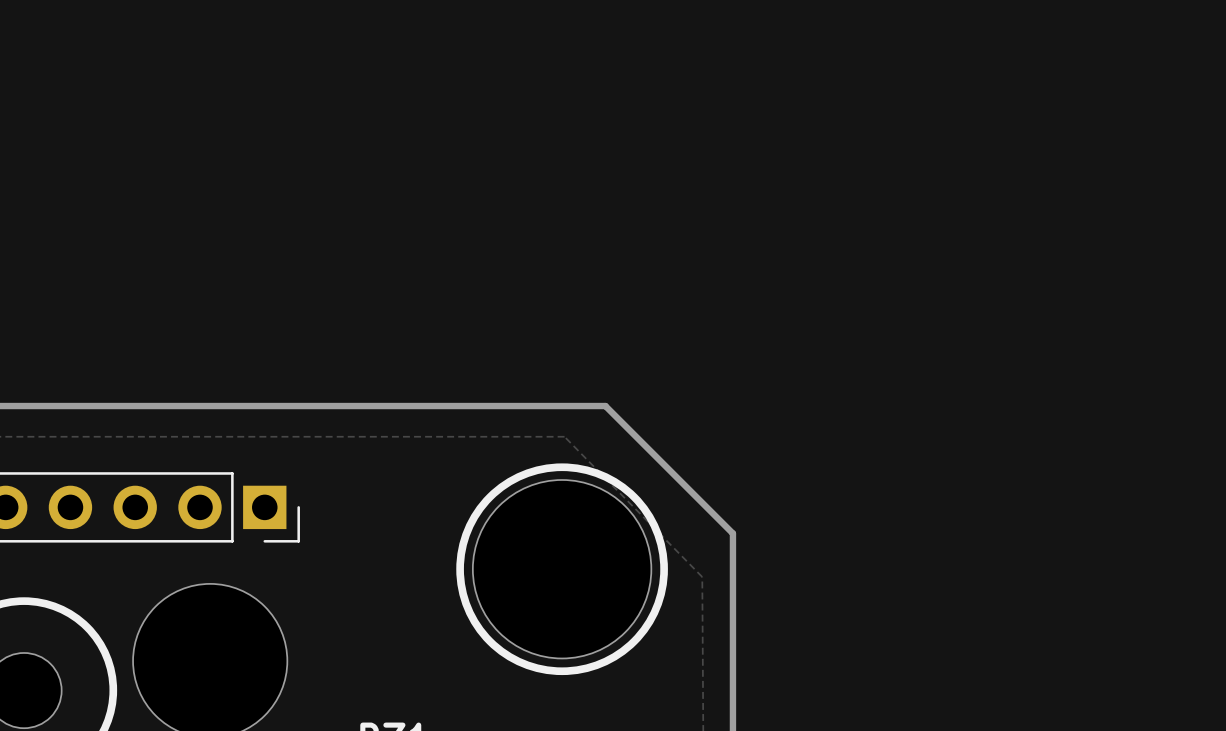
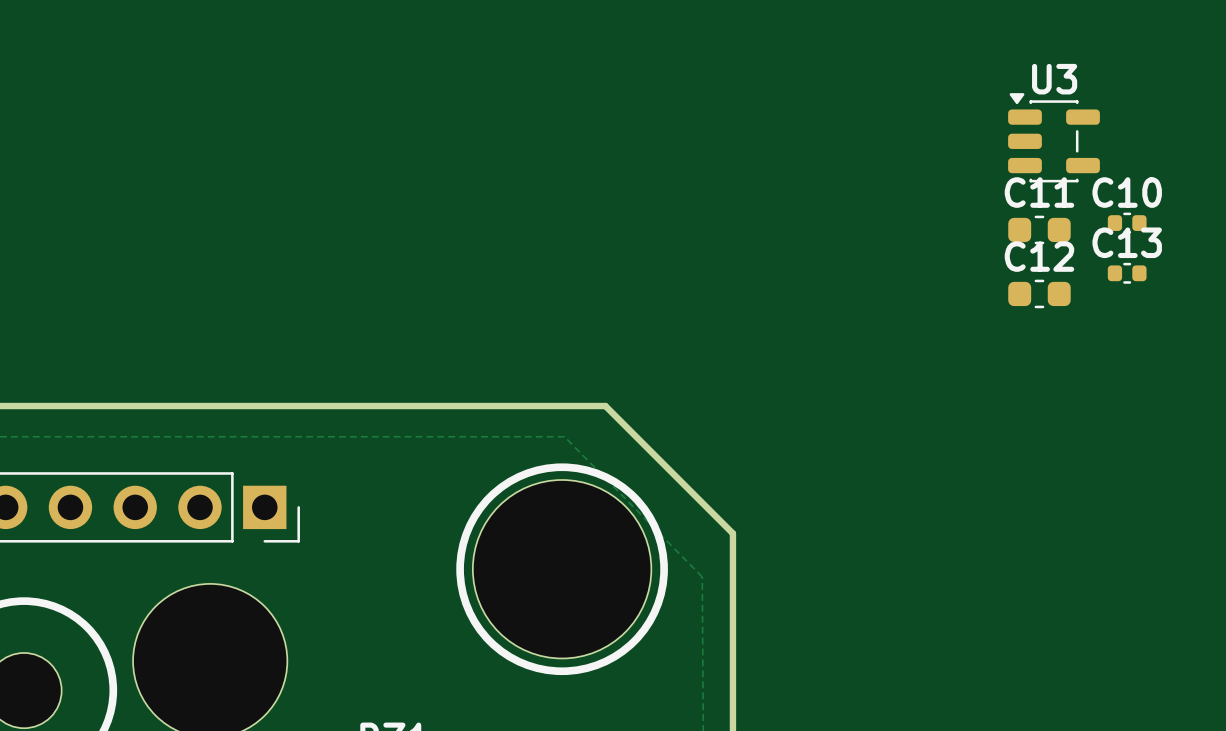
U3: none -> (1054, 137)
C10: none -> (1127, 223)
C11: none -> (1039, 229)
C13: none -> (1127, 273)
C12: none -> (1039, 293)

